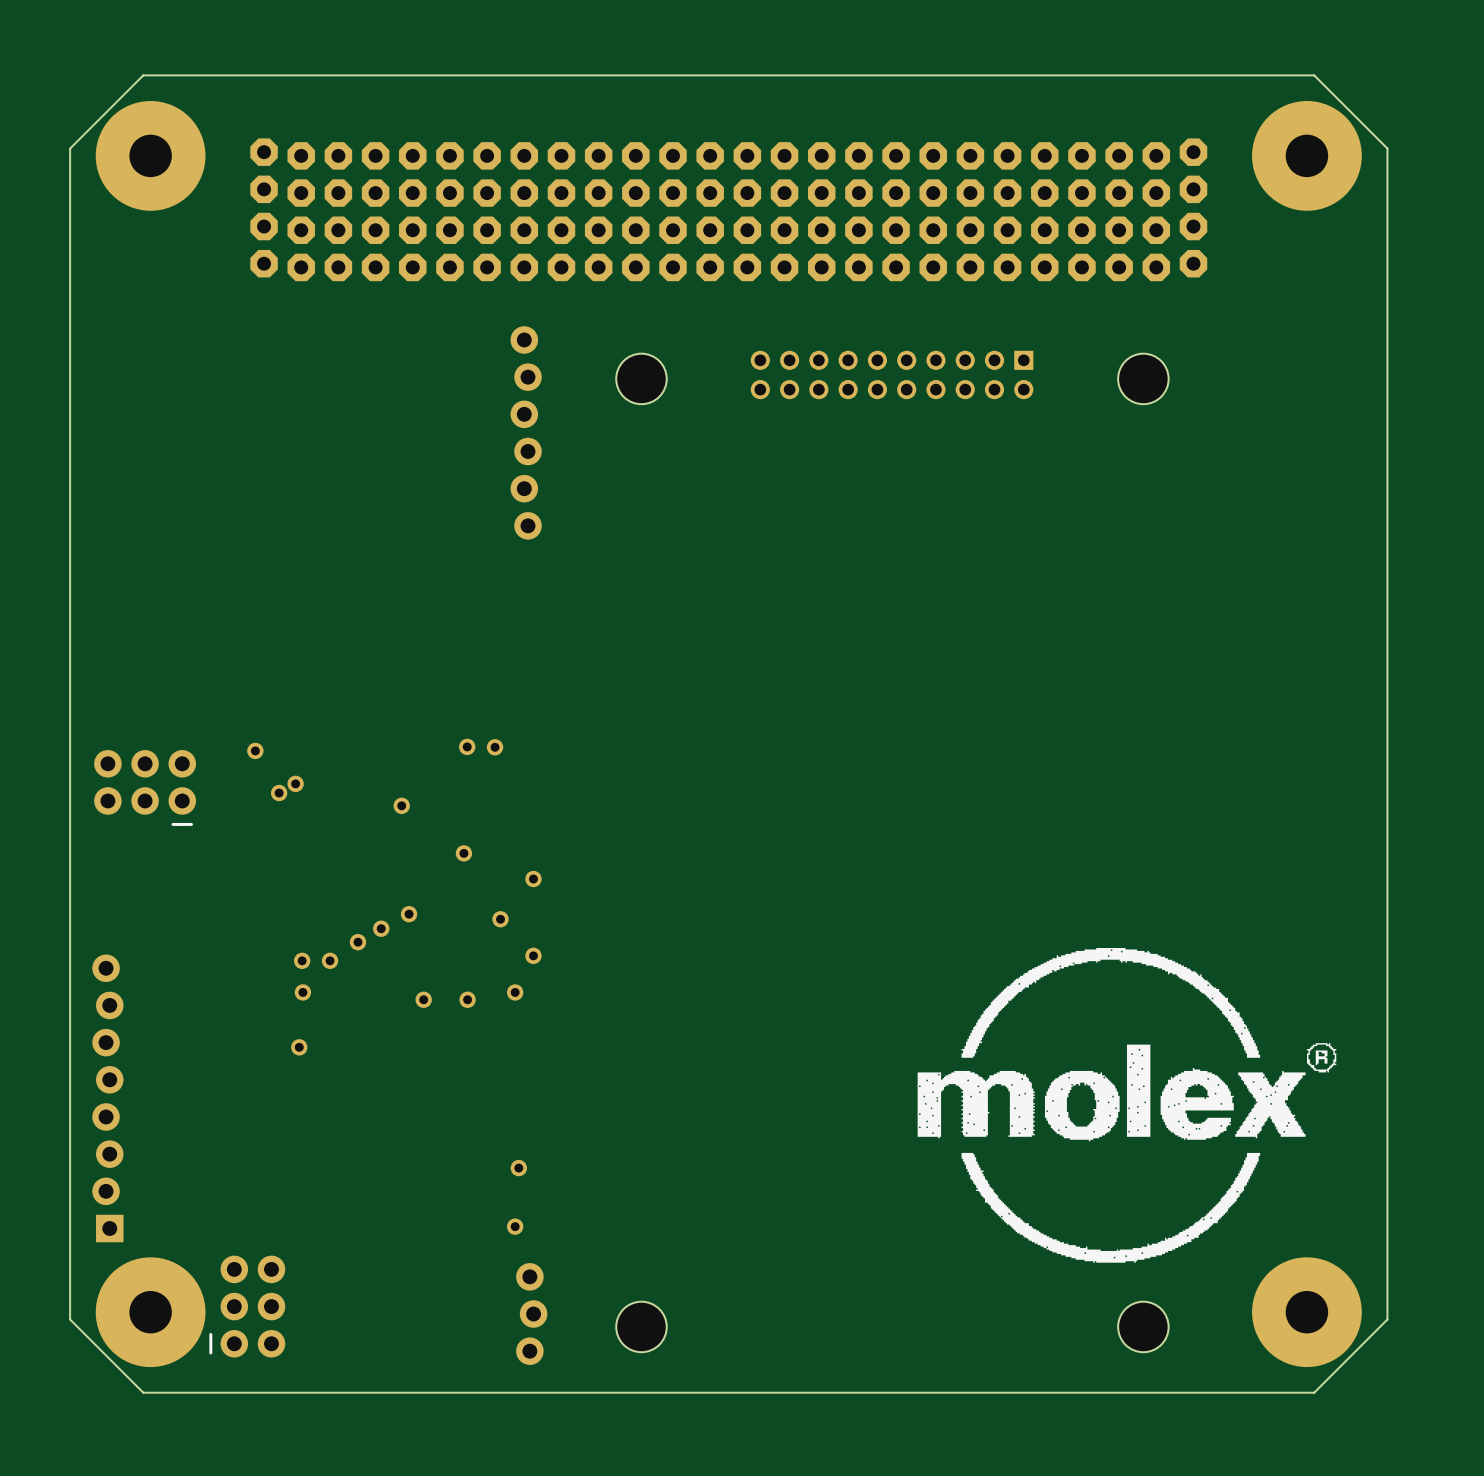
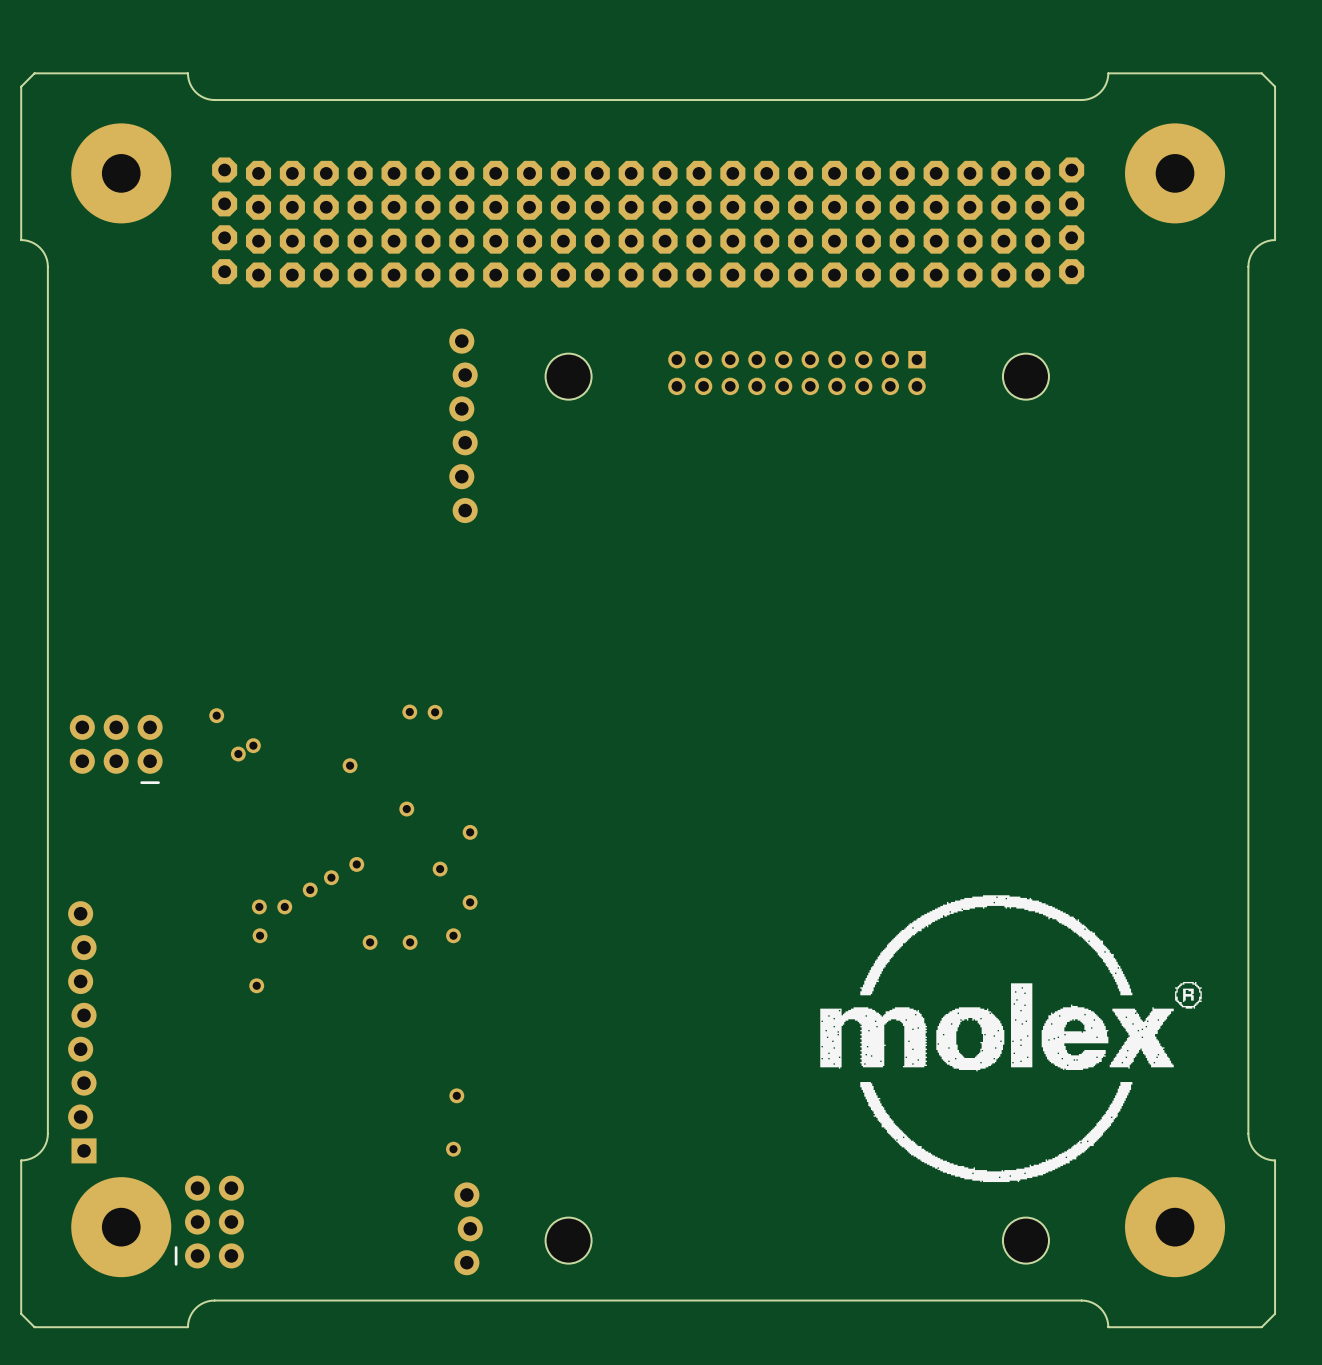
part footprint: [70, 75, 1388, 1393] -> [21, 73, 1276, 1328]

